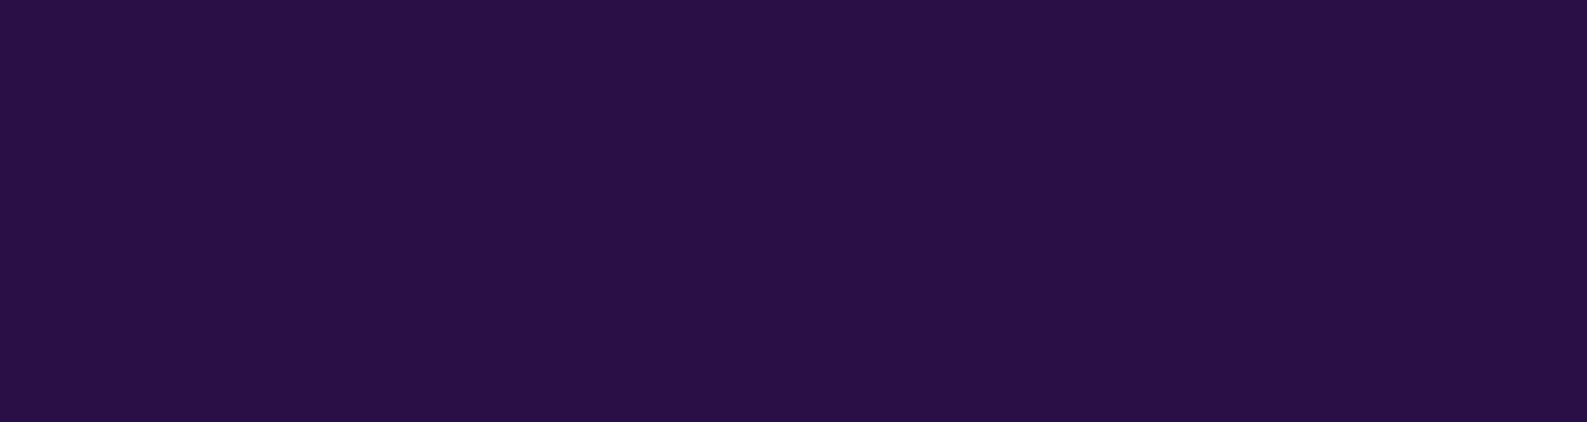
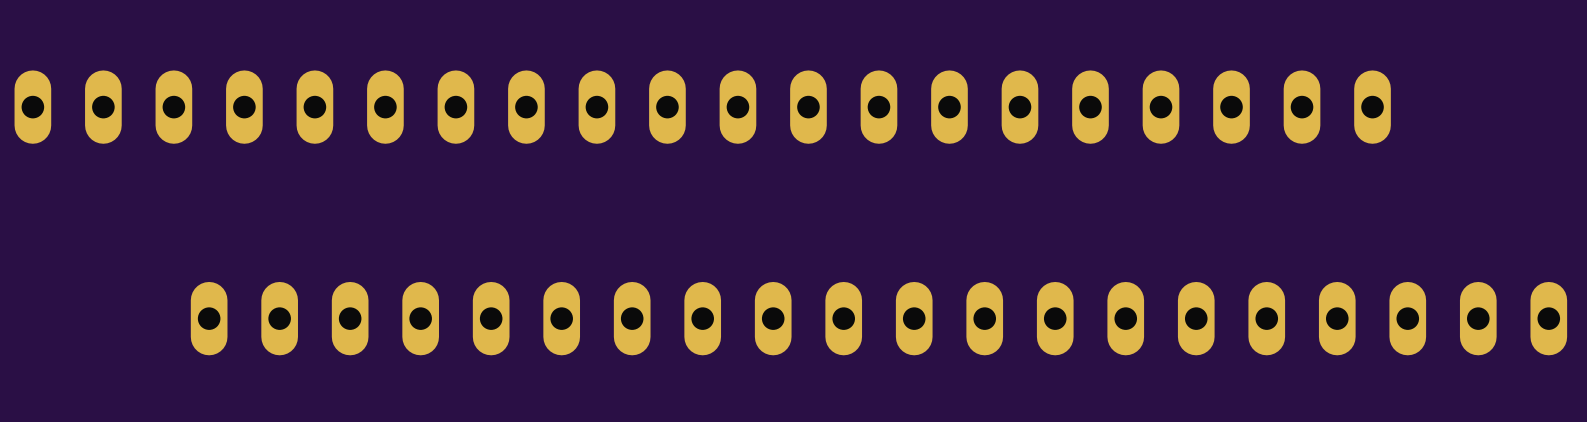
part: none -> (702, 107)
part: none -> (878, 318)

